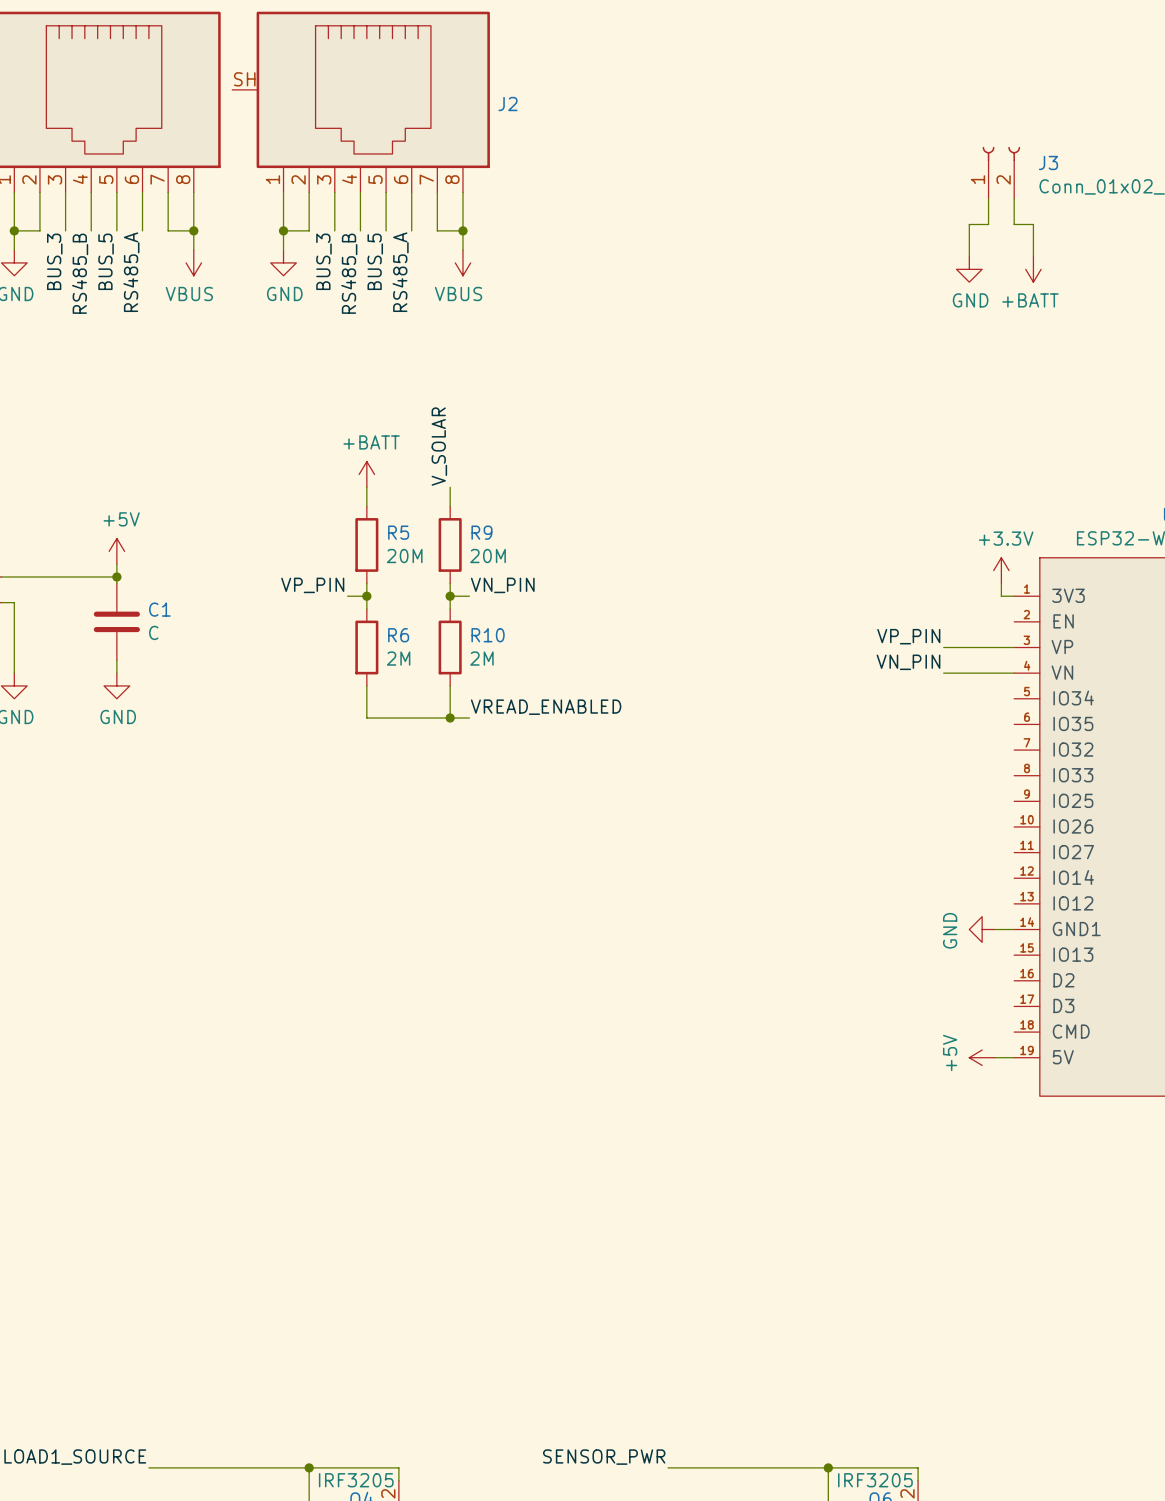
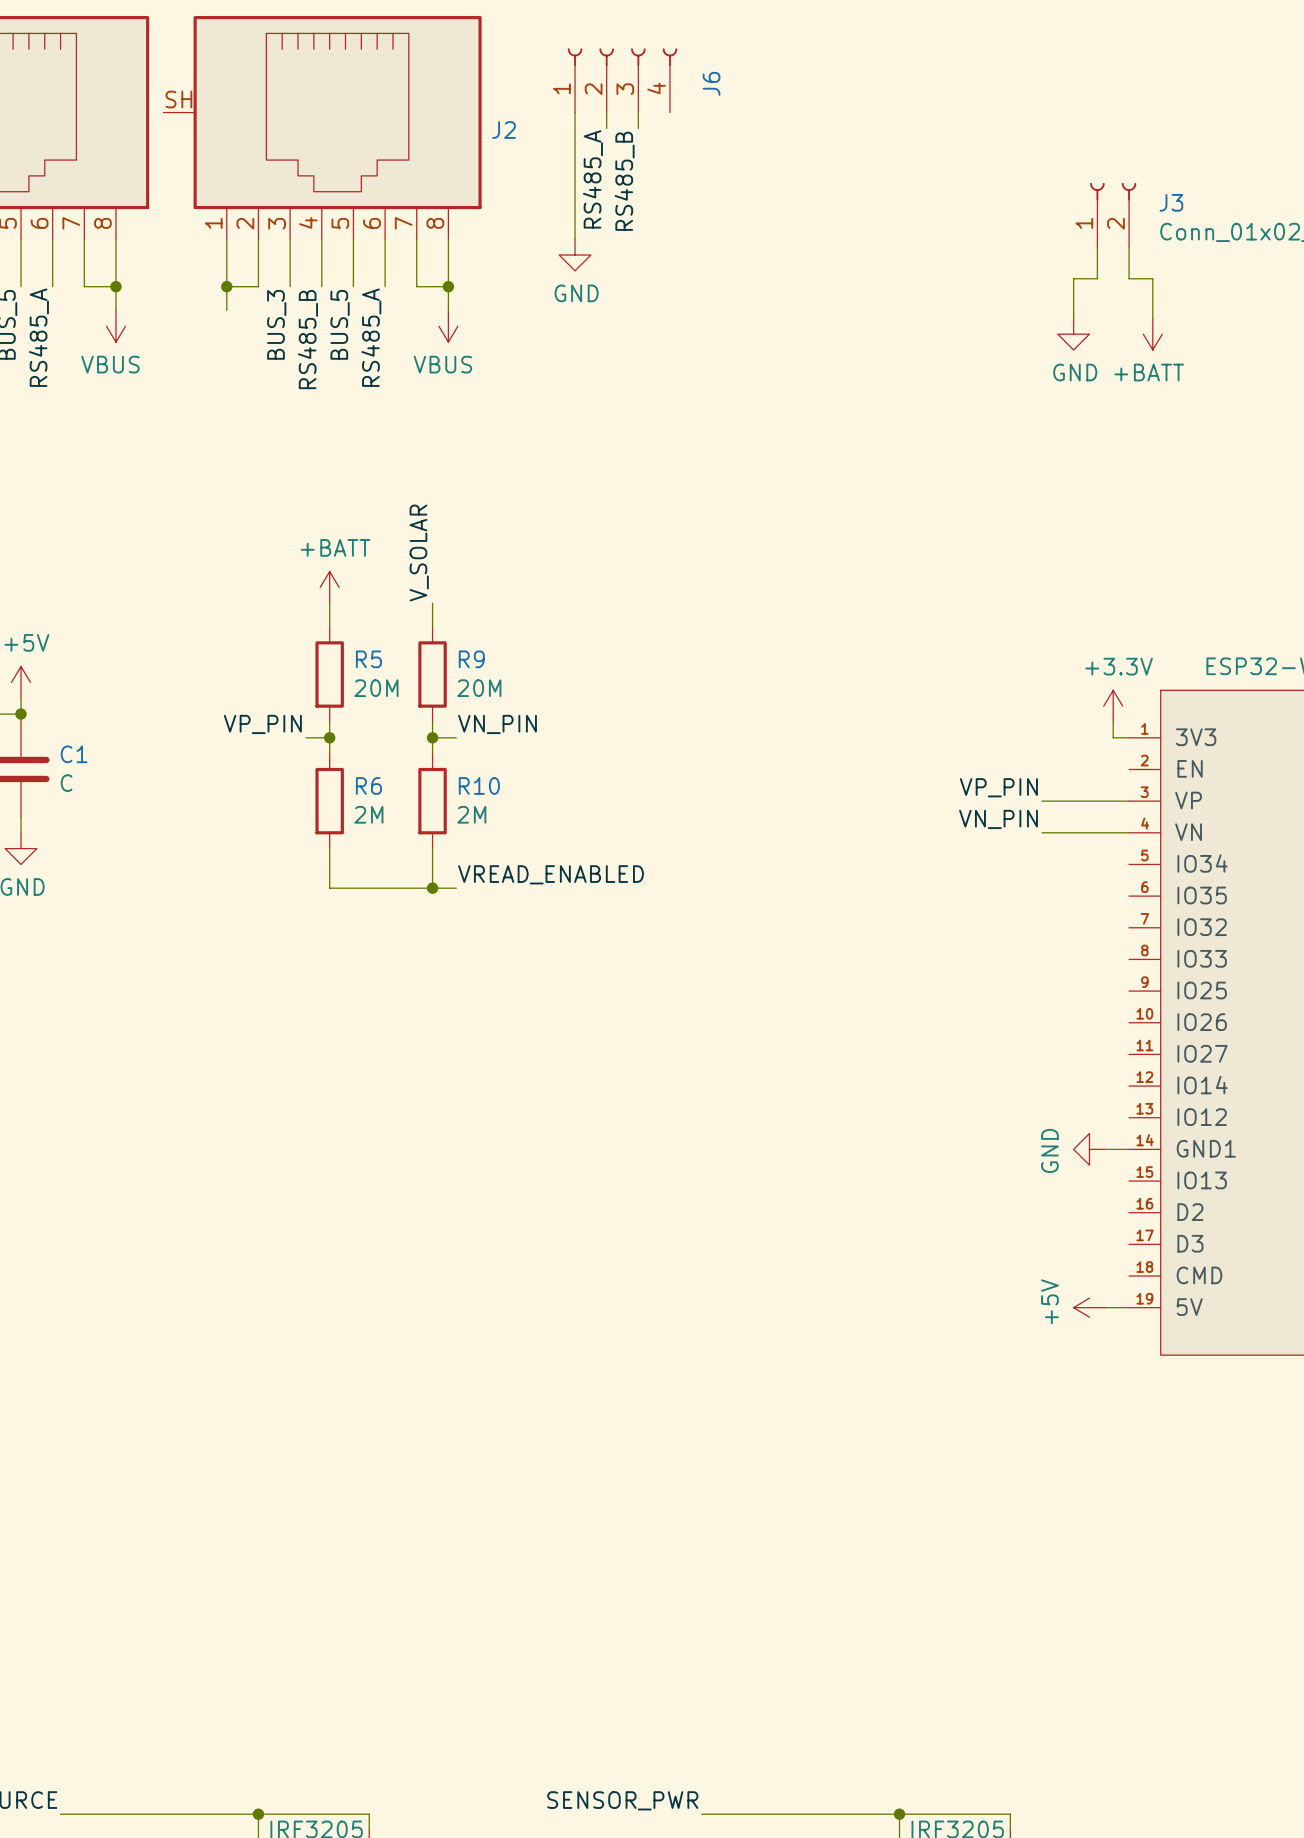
J6: none -> (622, 80)
wire: none -> (575, 112) (575, 239)
wire: none -> (606, 112) (606, 128)
wire: none -> (638, 112) (638, 128)
label: none -> RS485_A (592, 179)
label: none -> RS485_B (624, 181)
power symbol: none -> GND (575, 255)
power symbol: GND (283, 262) -> none

